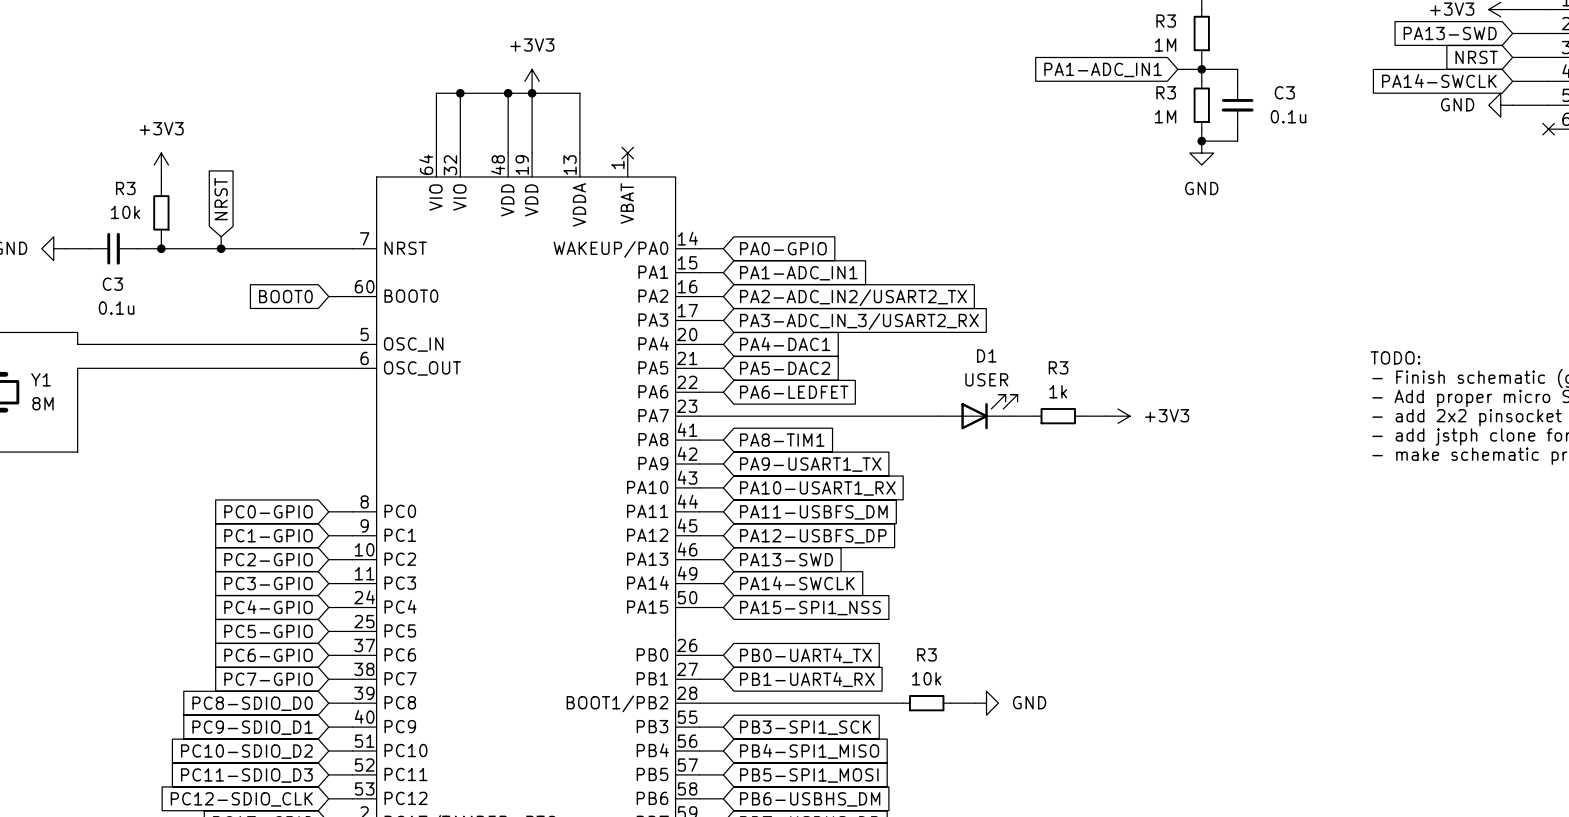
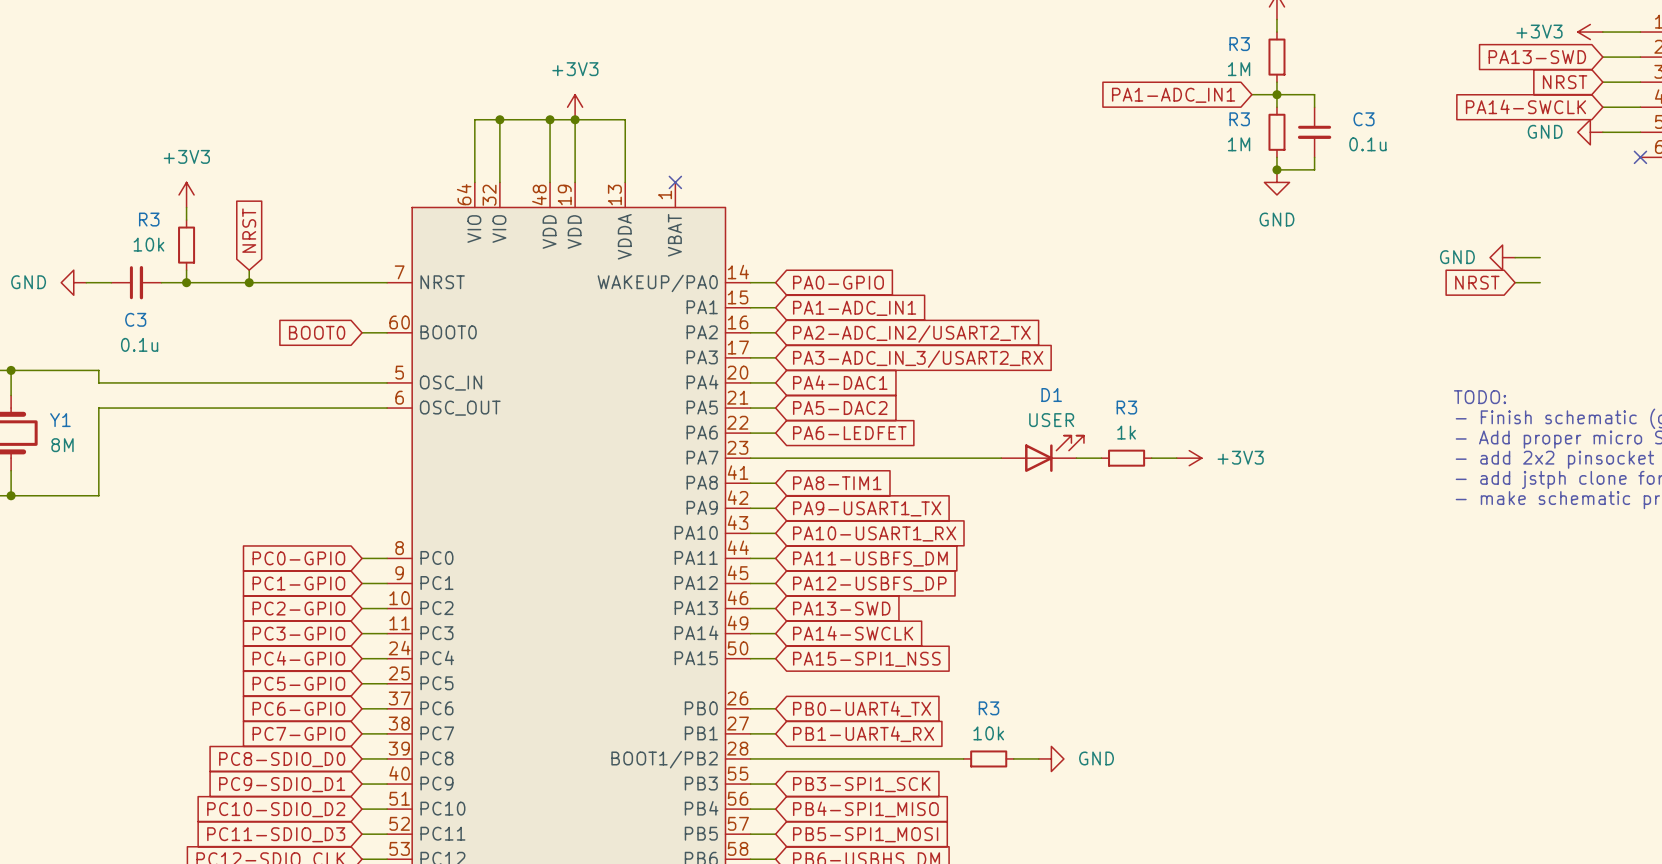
power symbol: none -> GND (1502, 257)
wire: none -> (1515, 257) (1540, 257)
global label: none -> NRST (1477, 282)
wire: none -> (1515, 282) (1540, 282)

